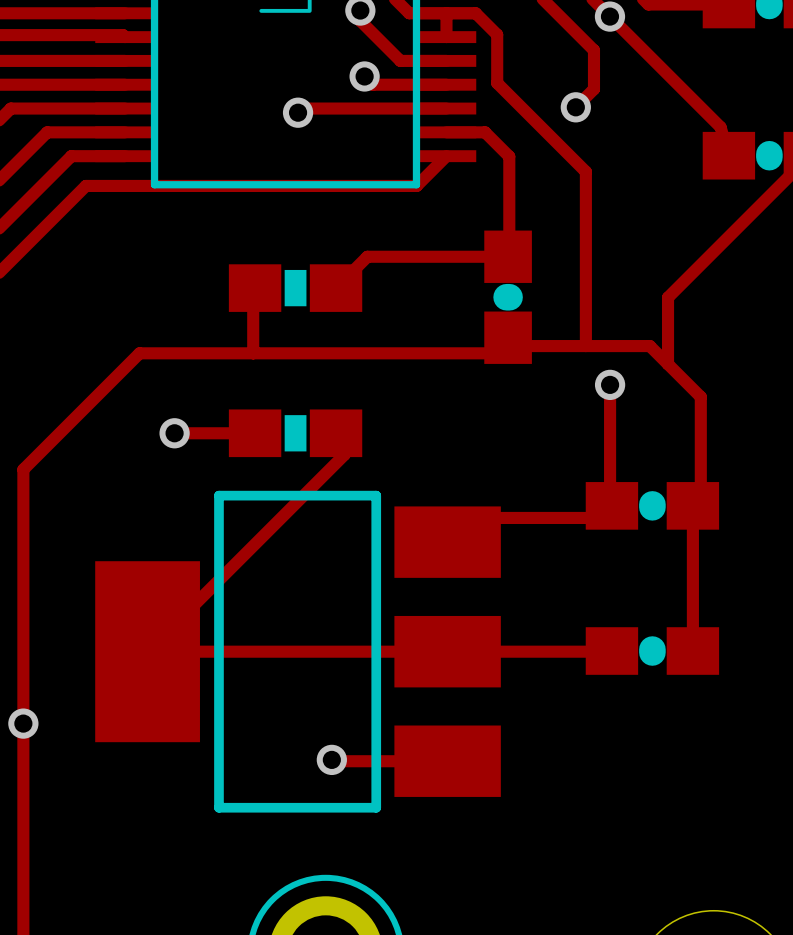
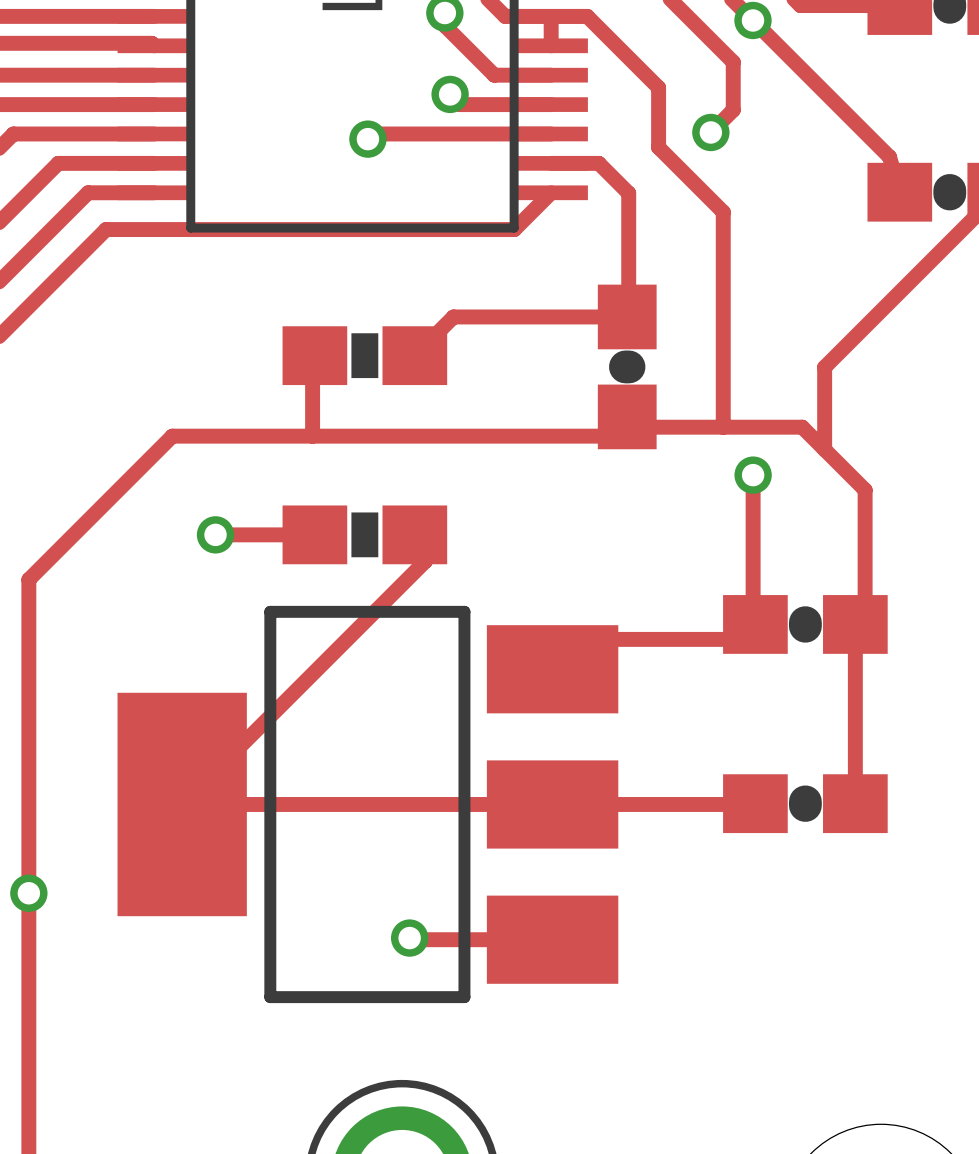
track: (497, 34) (497, 83) (533, 119) -> (613, 42) (658, 87) (658, 147)

